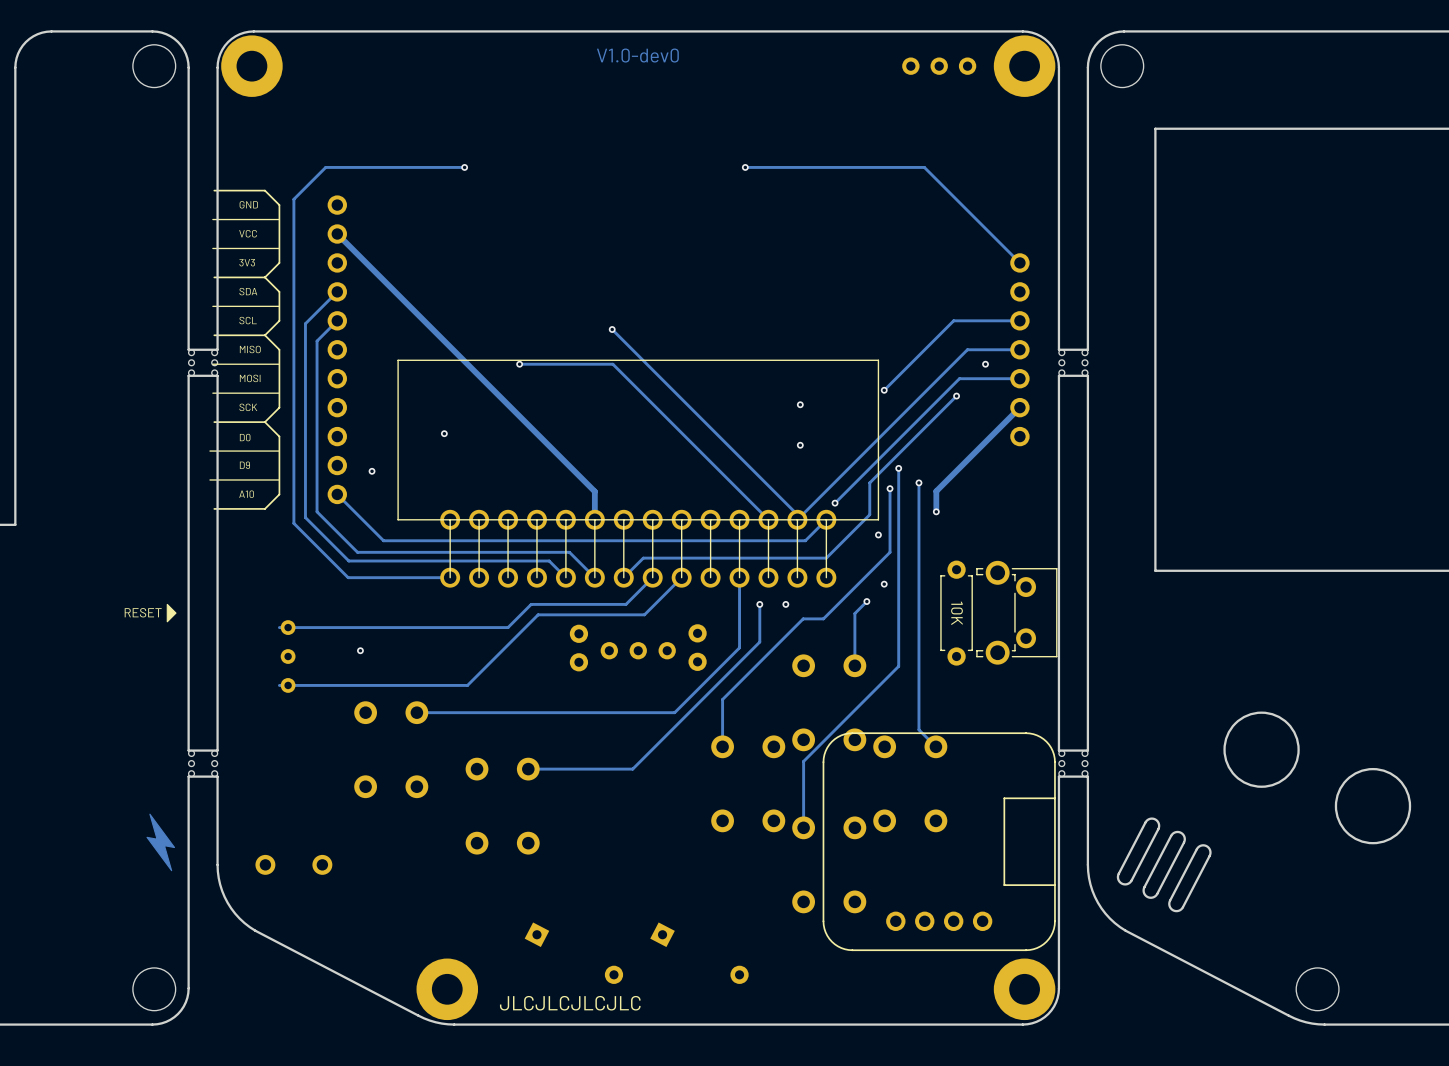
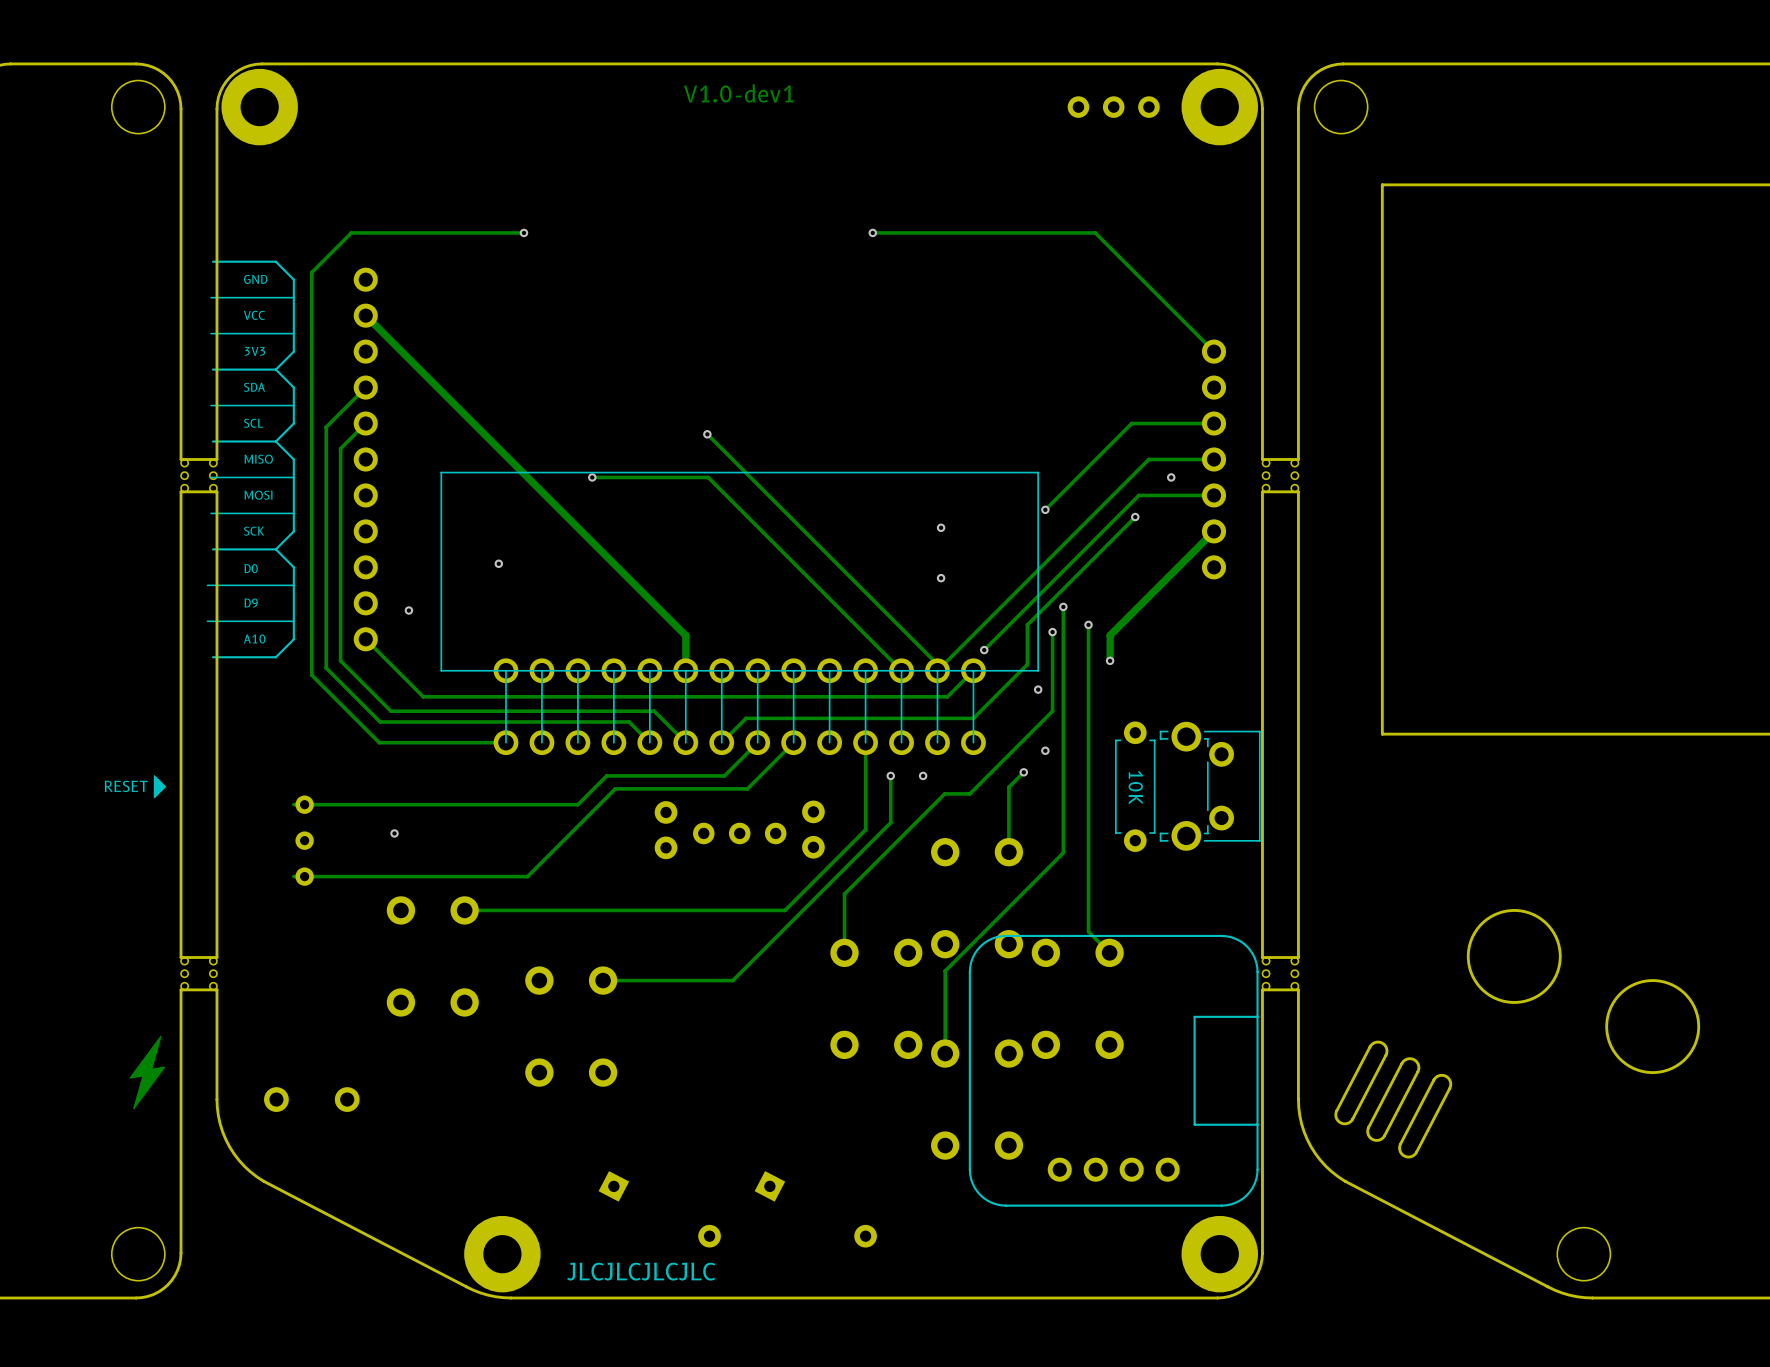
text: V1.0-dev0 (637, 55) -> V1.0-dev1 (738, 93)
drawing shape: [149, 813, 176, 849] -> [129, 1035, 162, 1079]
drawing shape: [146, 836, 173, 872] -> [133, 1066, 166, 1110]

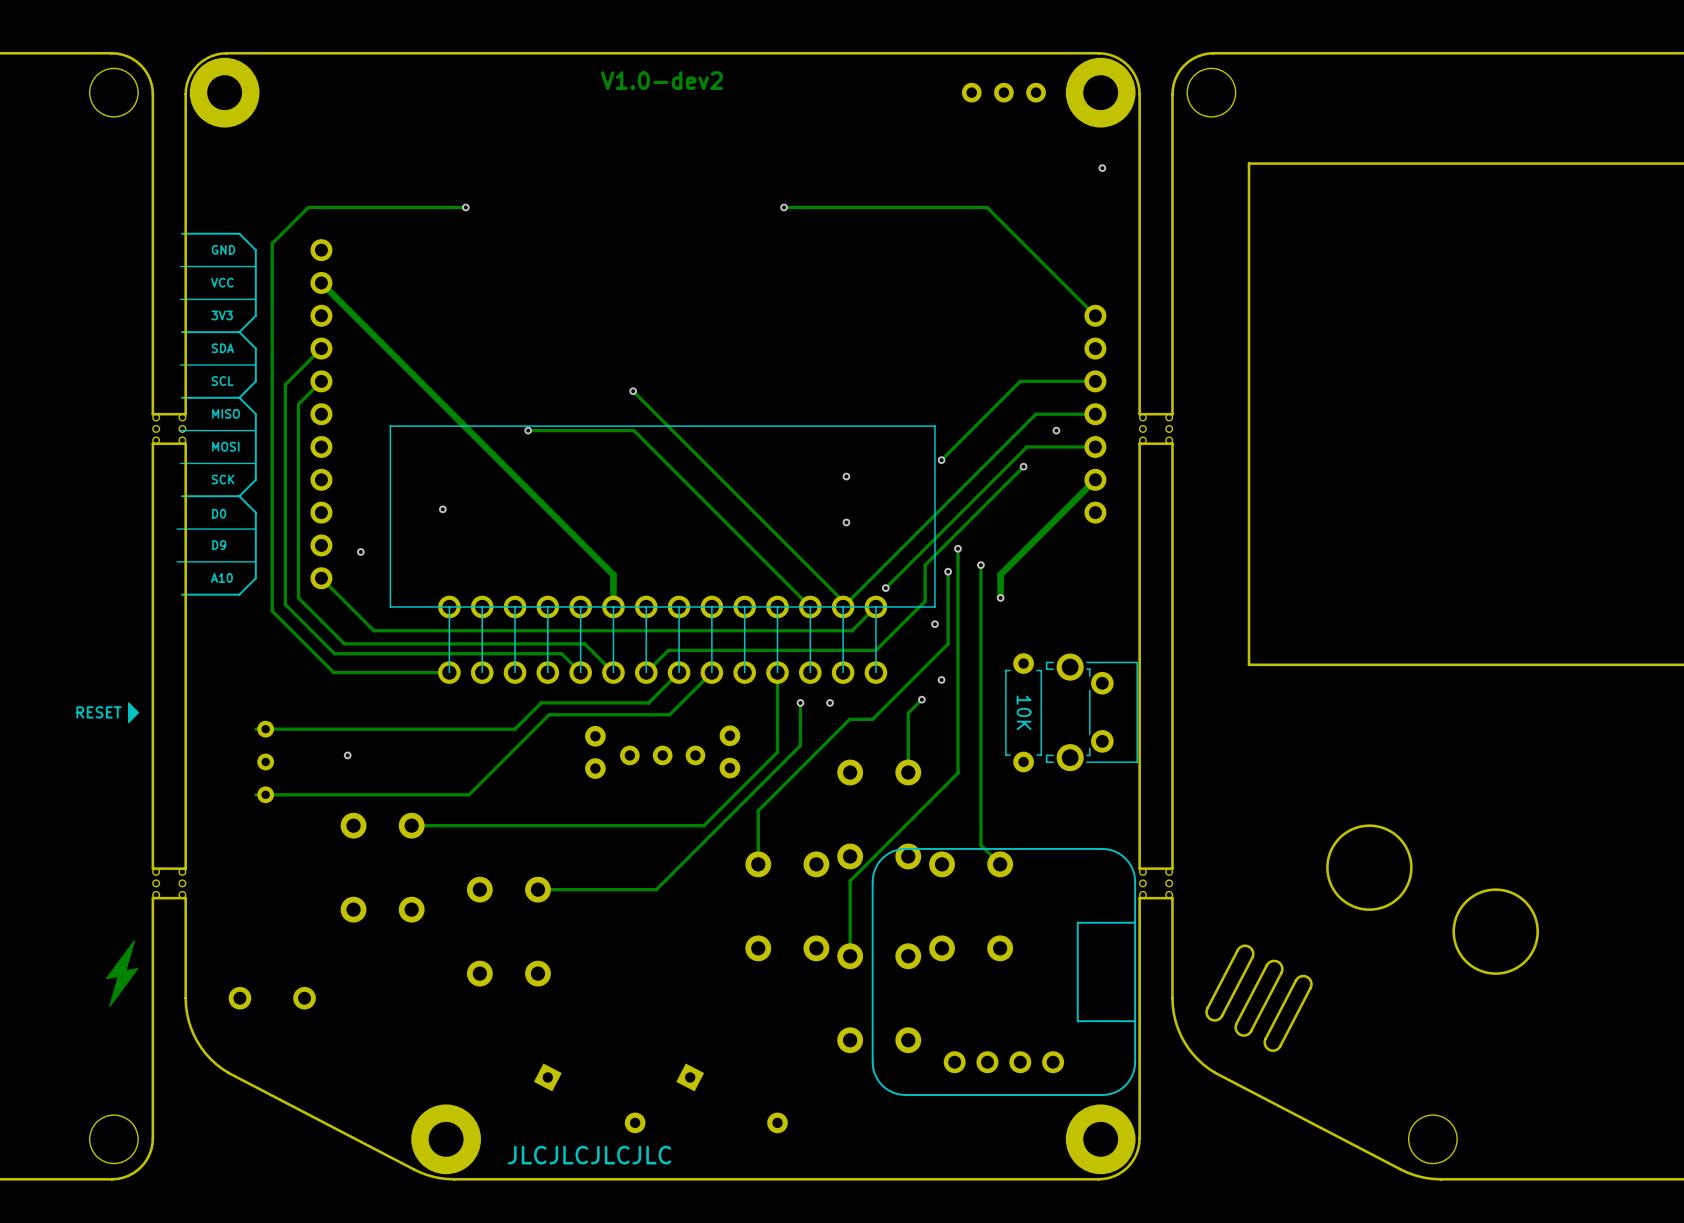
text: V1.0-dev1 (738, 93) -> V1.0-dev2 (661, 80)
via: none -> (1102, 168)

